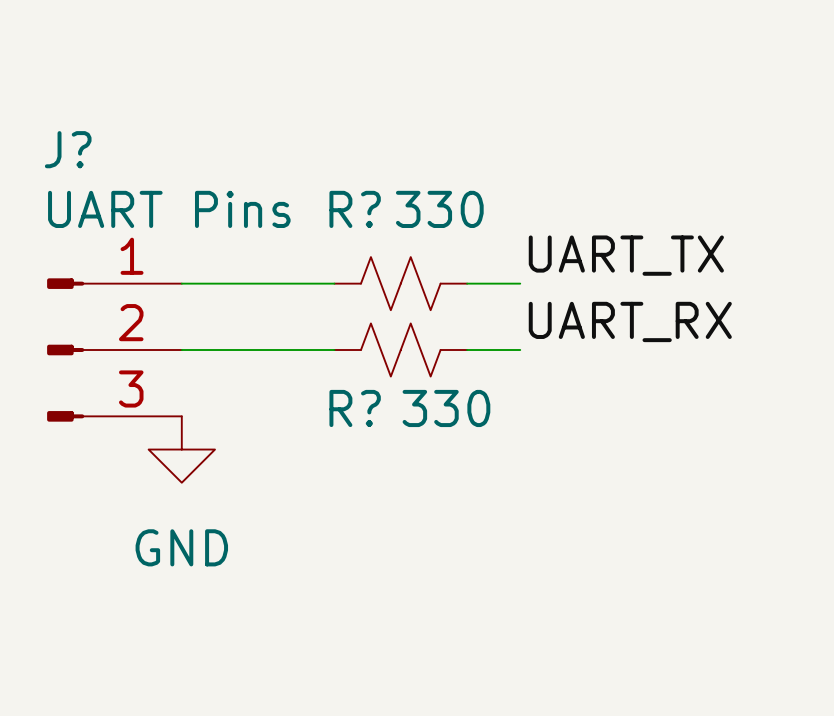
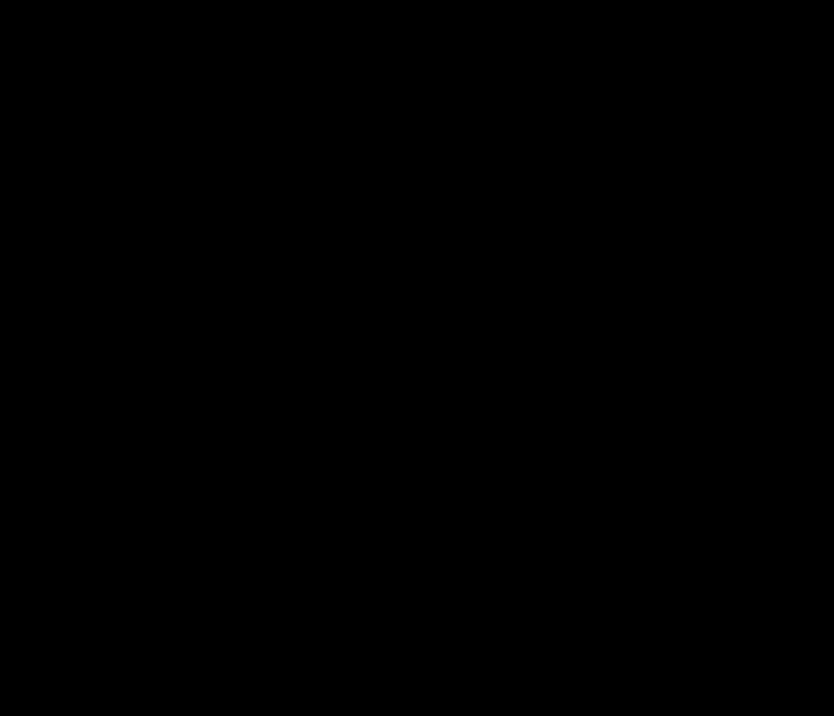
label: UART_TX (626, 255) -> none
wire: (181, 283) (334, 283) -> none
R?: 330 (400, 283) -> none
wire: (467, 283) (520, 283) -> none
label: UART_RX (630, 321) -> none
J?: UART Pins (114, 350) -> none
wire: (181, 350) (334, 350) -> none
R?: 330 (400, 350) -> none
wire: (467, 350) (520, 350) -> none
power symbol: GND (181, 449) -> none

